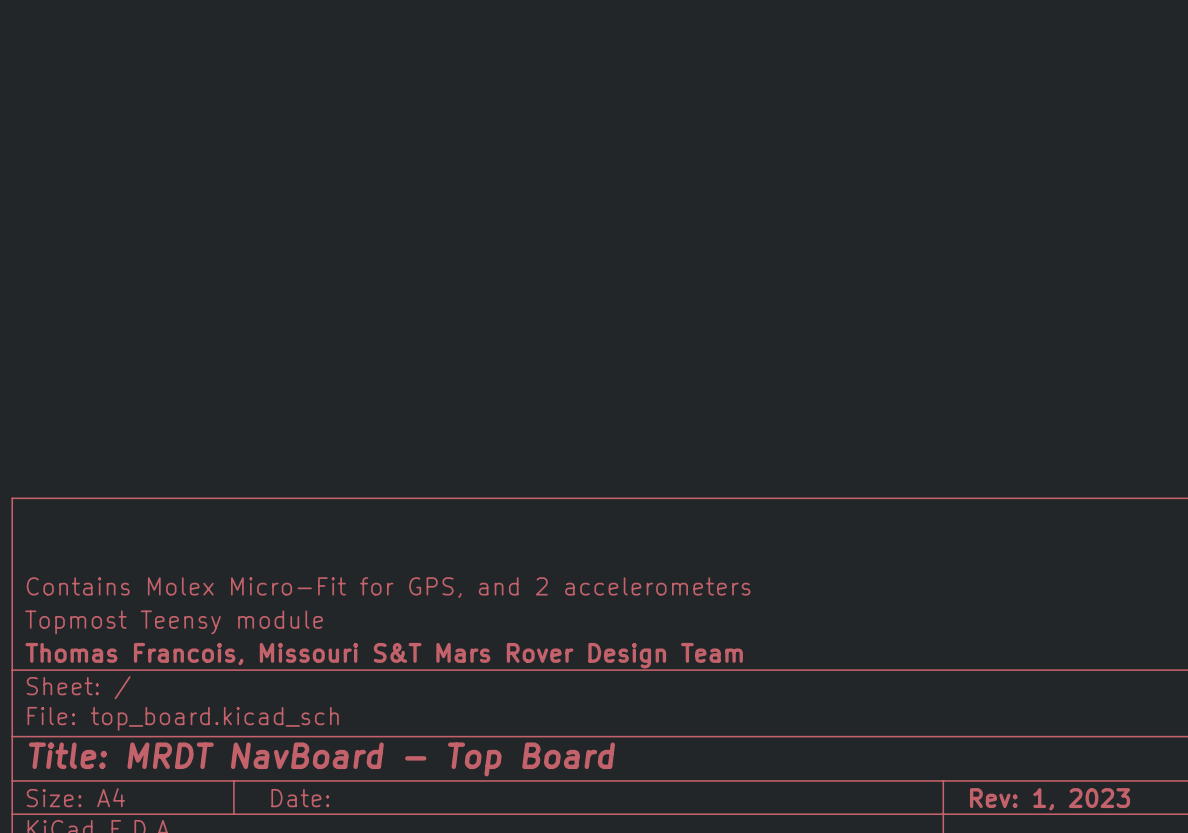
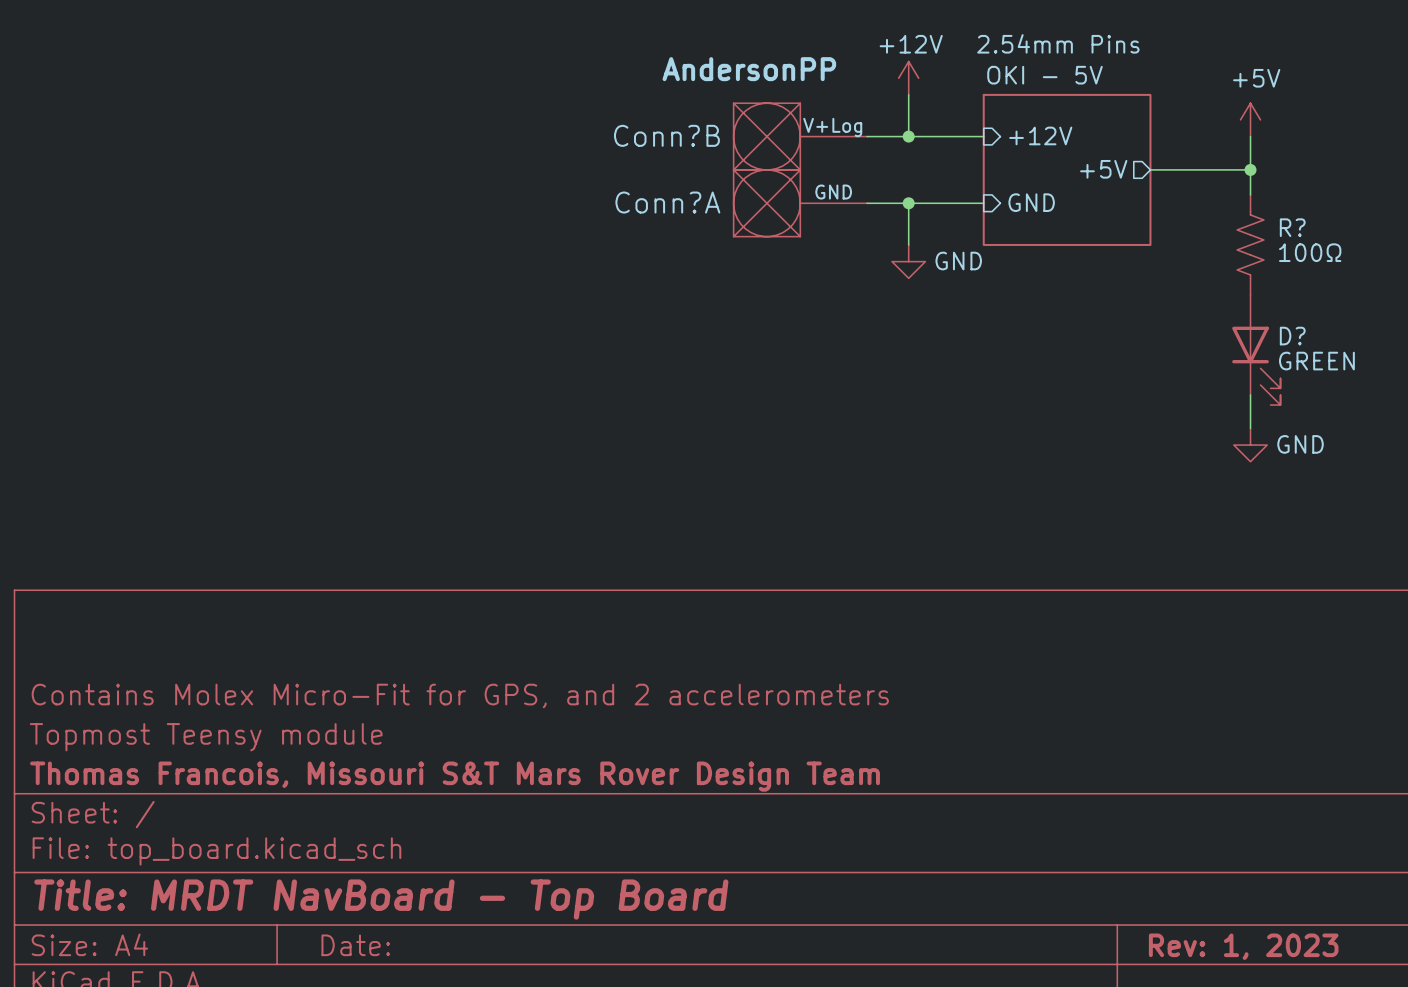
power symbol: none -> +12V (908, 78)
wire: none -> (908, 94) (908, 136)
power symbol: none -> +5V (1250, 119)
sheet pin: none -> +12V (1040, 135)
Conn?B: none -> AndersonPP (800, 136)
wire: none -> (867, 136) (983, 136)
junction: none -> (908, 136)
wire: none -> (1250, 136) (1250, 194)
sheet pin: none -> +5V (1103, 169)
sheet OKI - 5V: none -> (1067, 169)
wire: none -> (1150, 169) (1250, 169)
junction: none -> (1250, 169)
Conn?A: none -> (800, 203)
wire: none -> (867, 203) (983, 203)
wire: none -> (908, 203) (908, 244)
junction: none -> (908, 203)
sheet pin: none -> GND (1031, 202)
R?: none -> 100Ω (1250, 244)
power symbol: none -> GND (908, 261)
D?: none -> GREEN (1256, 350)
wire: none -> (1250, 395) (1250, 428)
power symbol: none -> GND (1250, 445)

